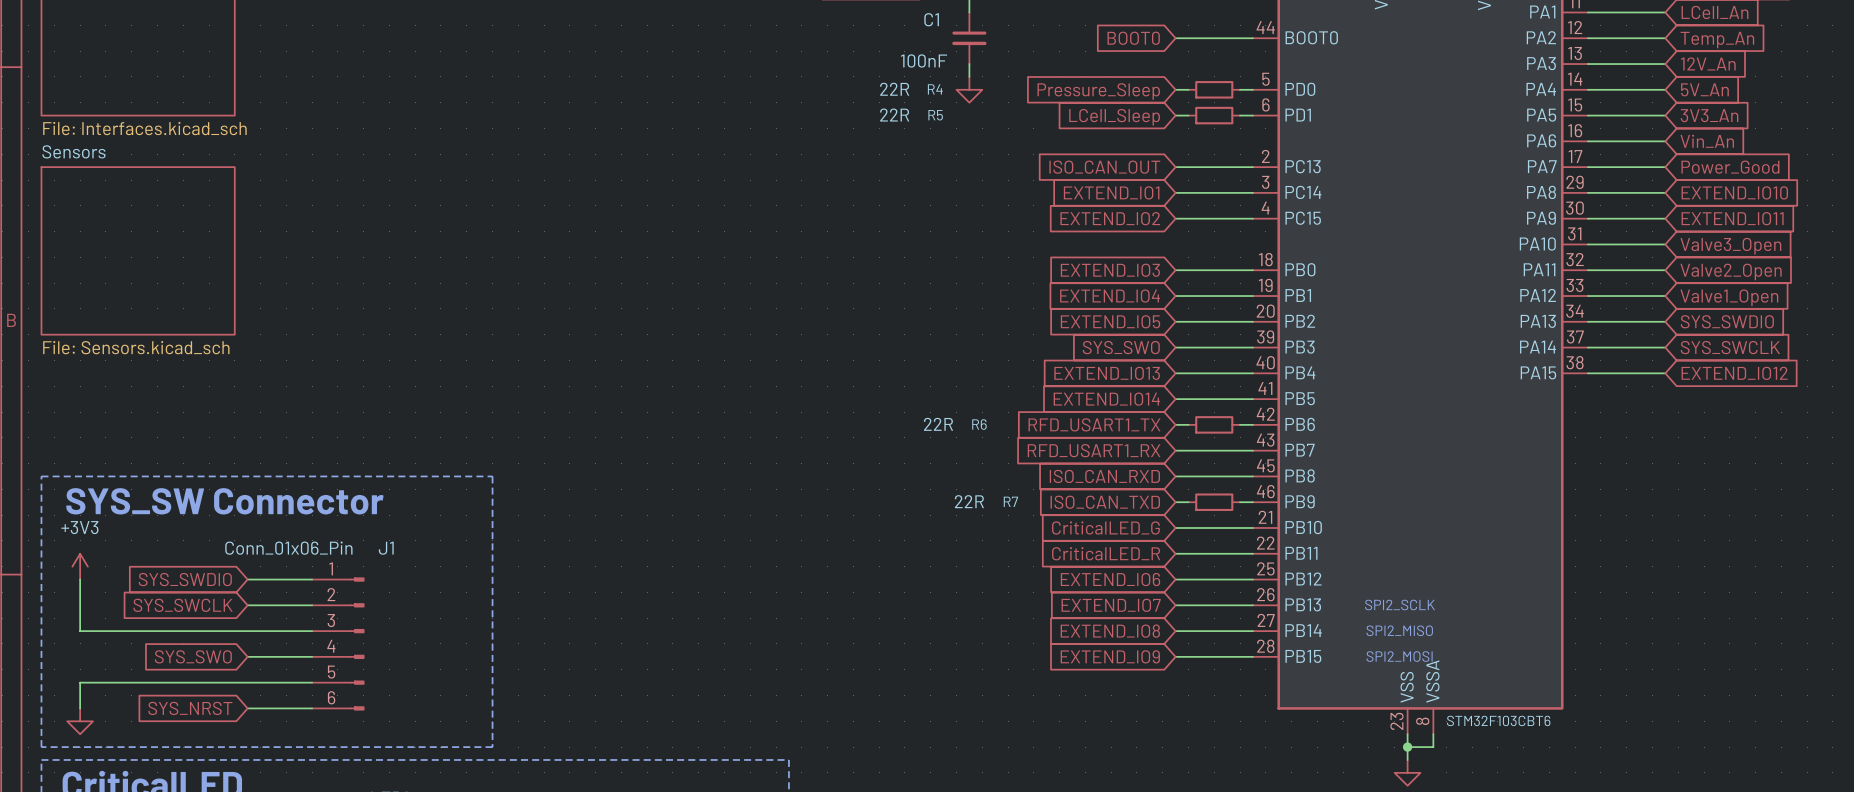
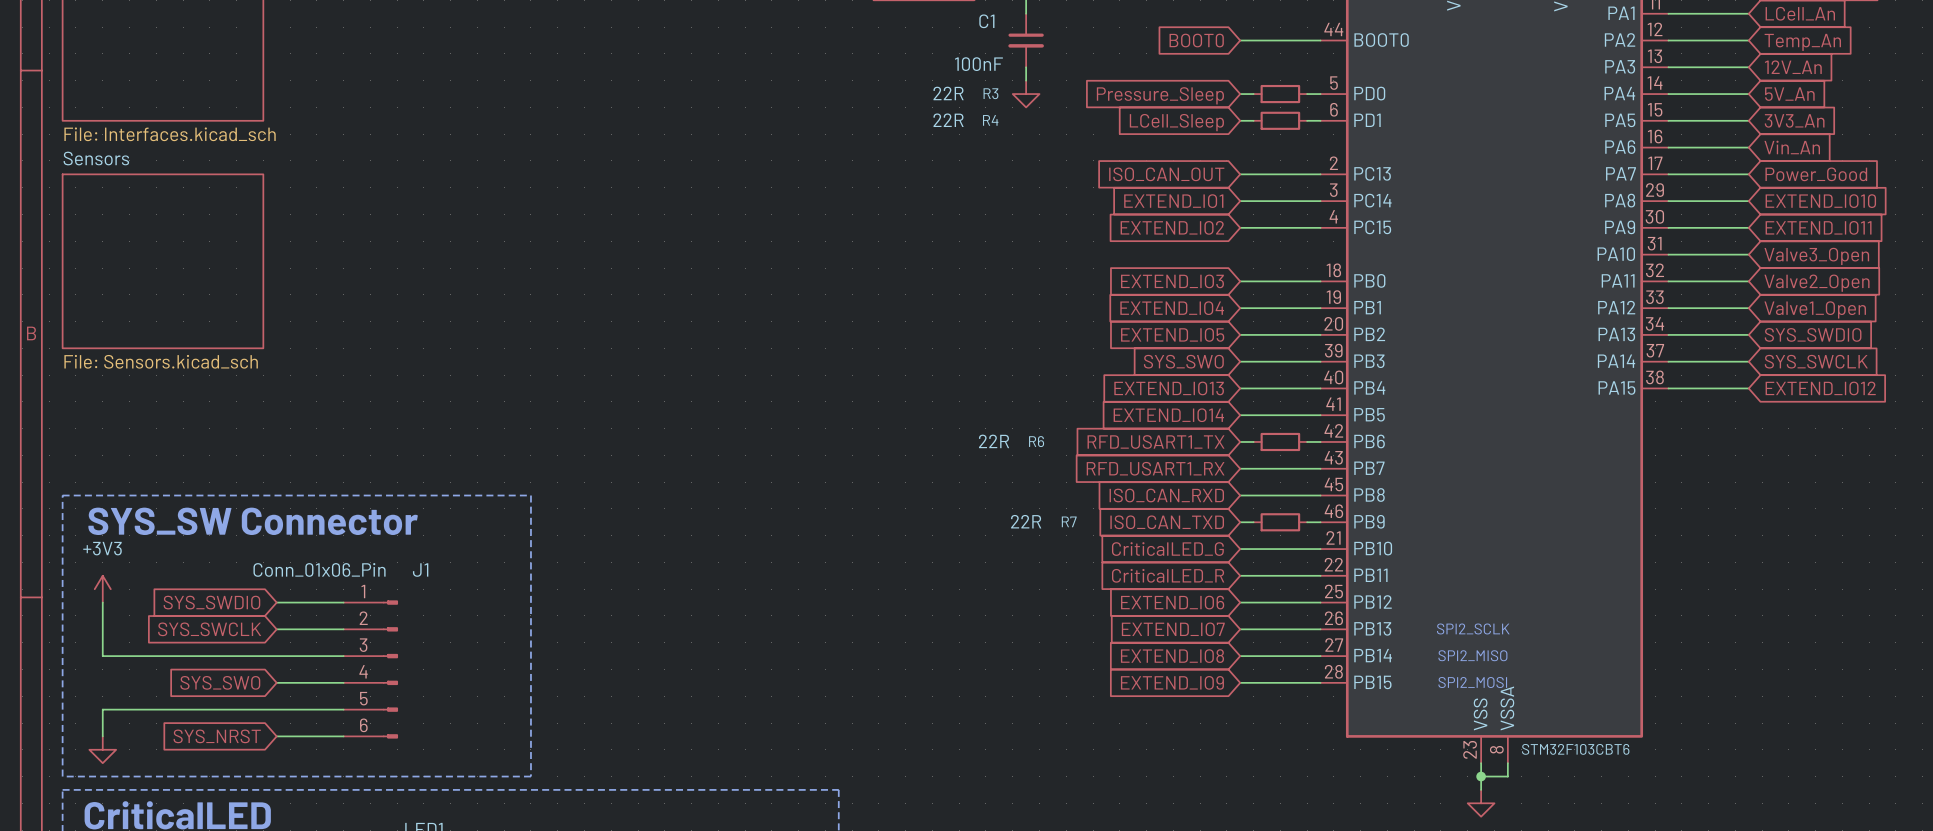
R4 name: R4 (935, 89) -> R3 (990, 93)
R5 name: R5 (935, 115) -> R4 (990, 120)

